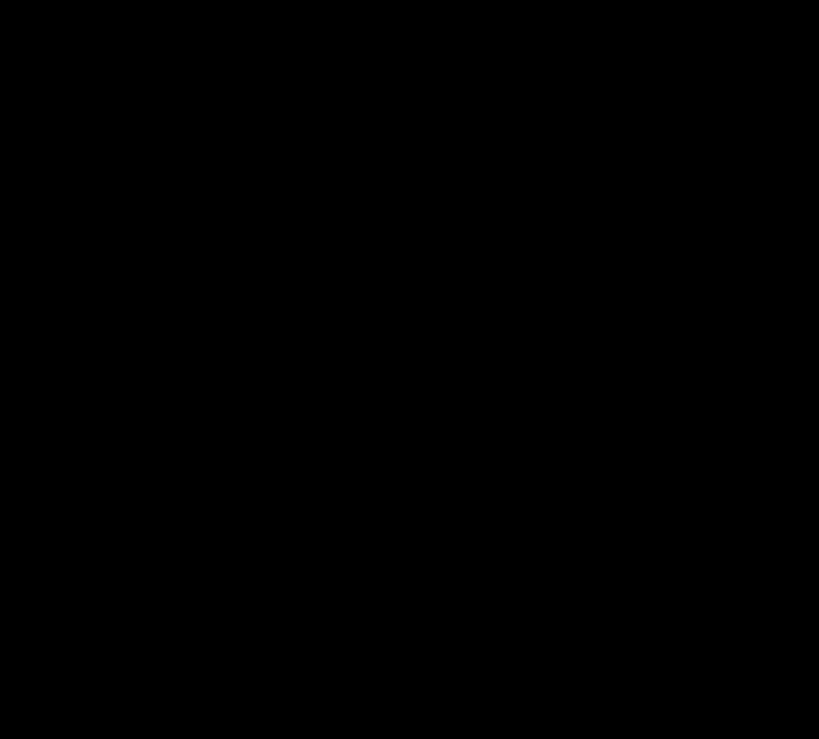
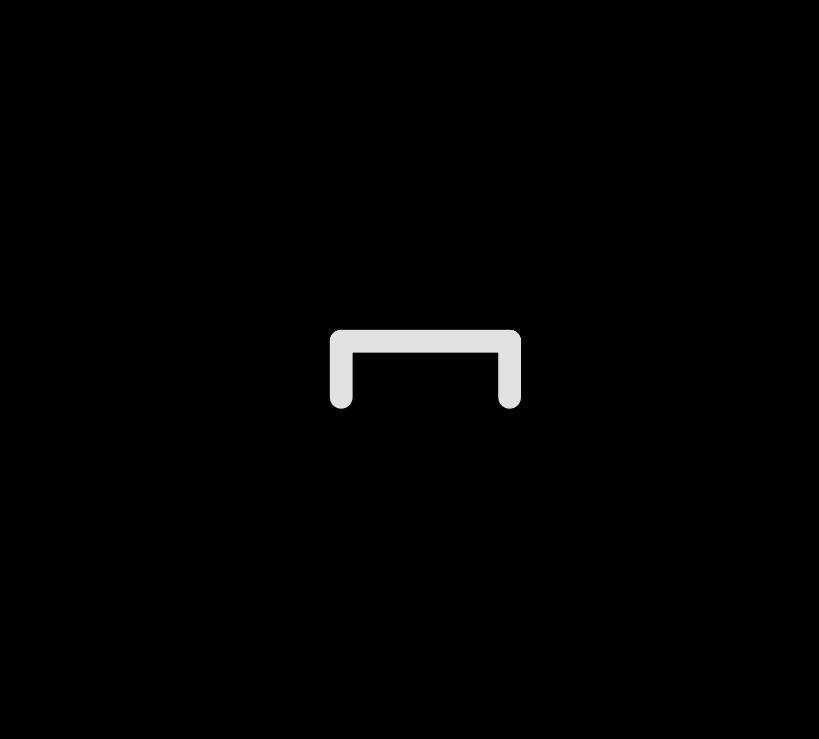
line: none -> (341, 397) (341, 341) (509, 341) (509, 397)

